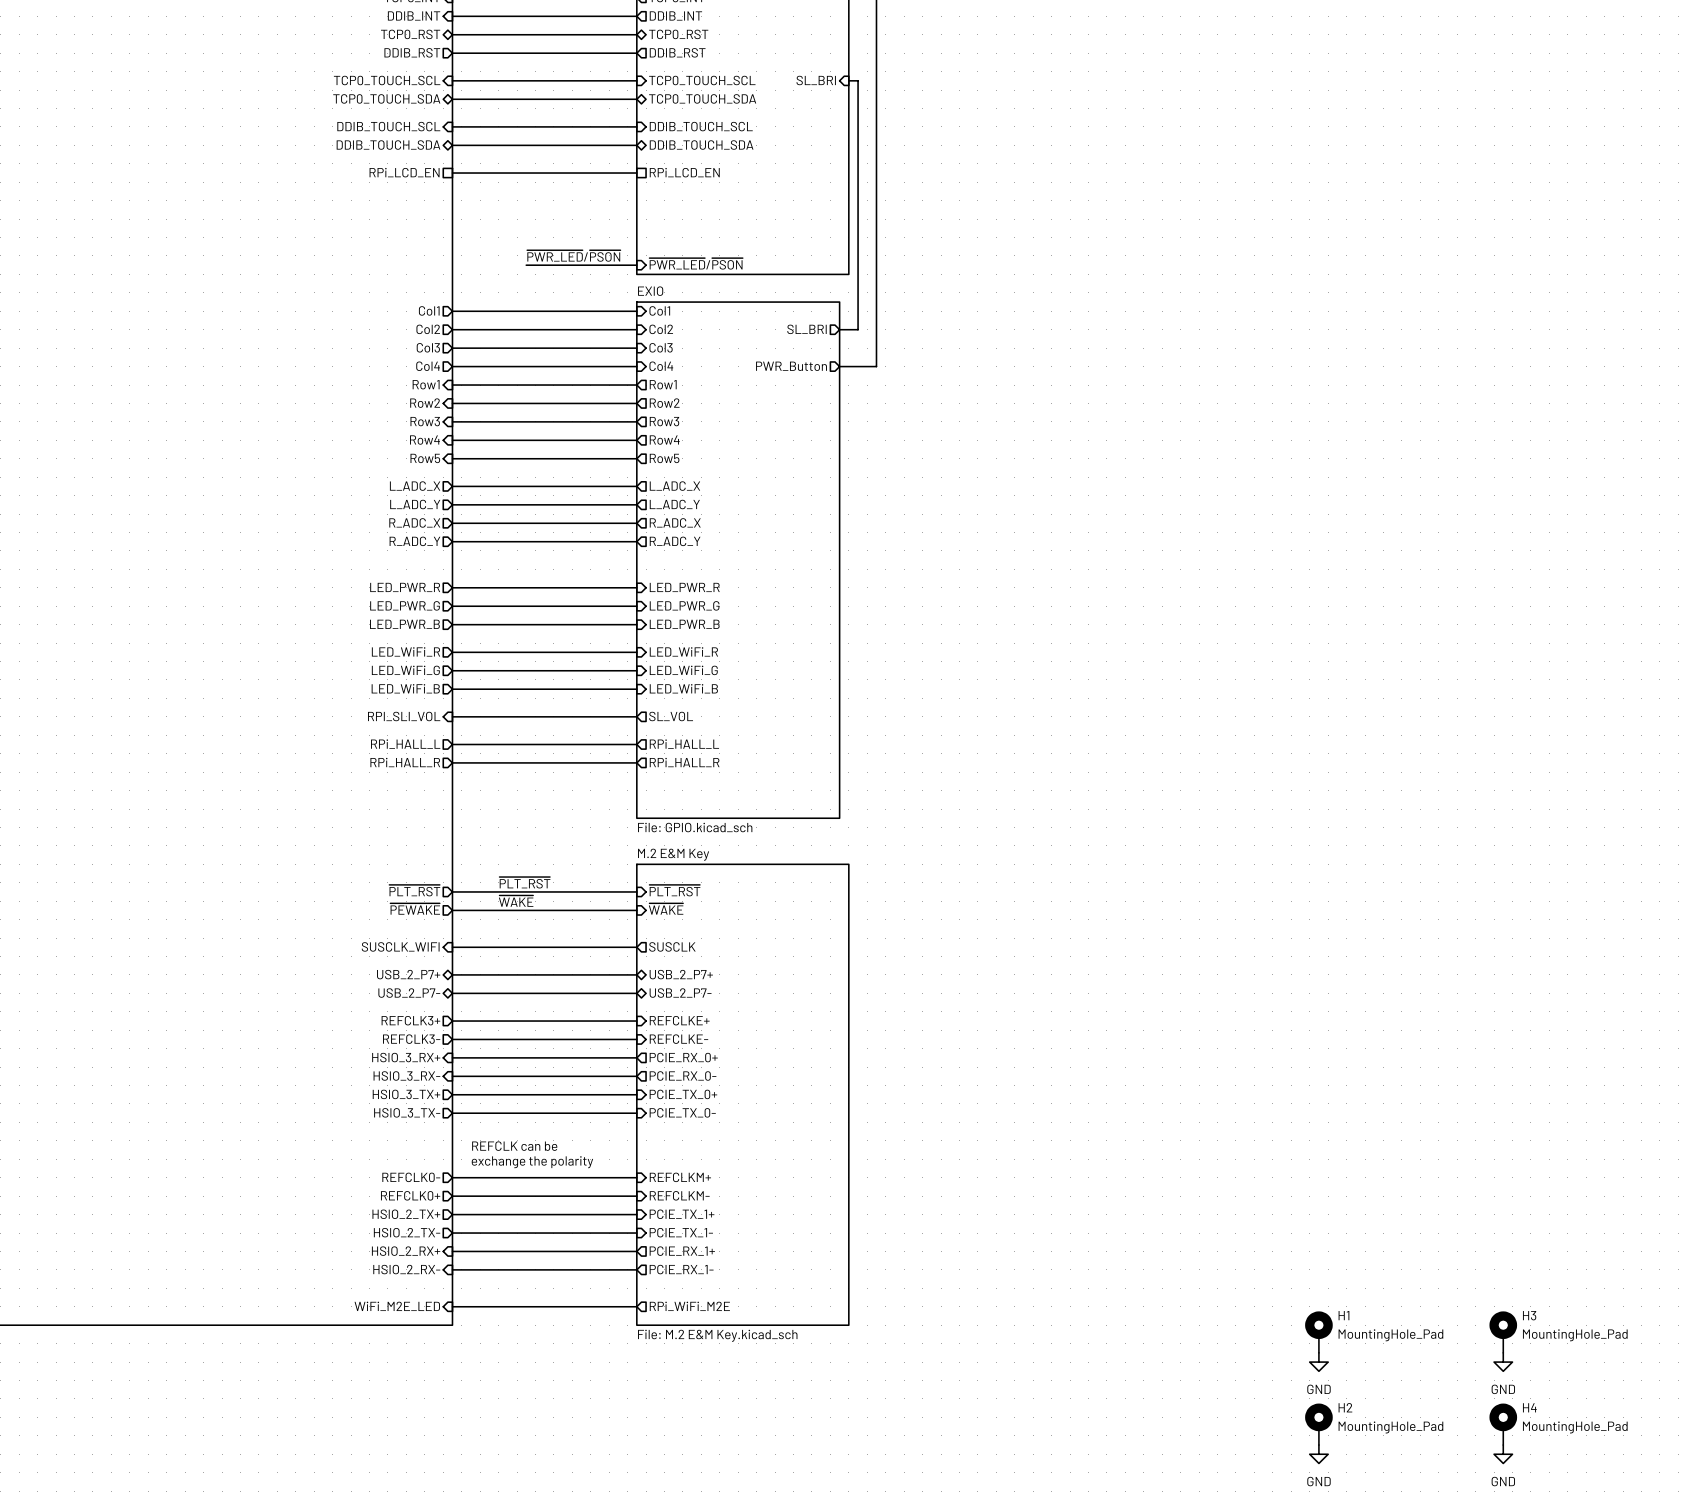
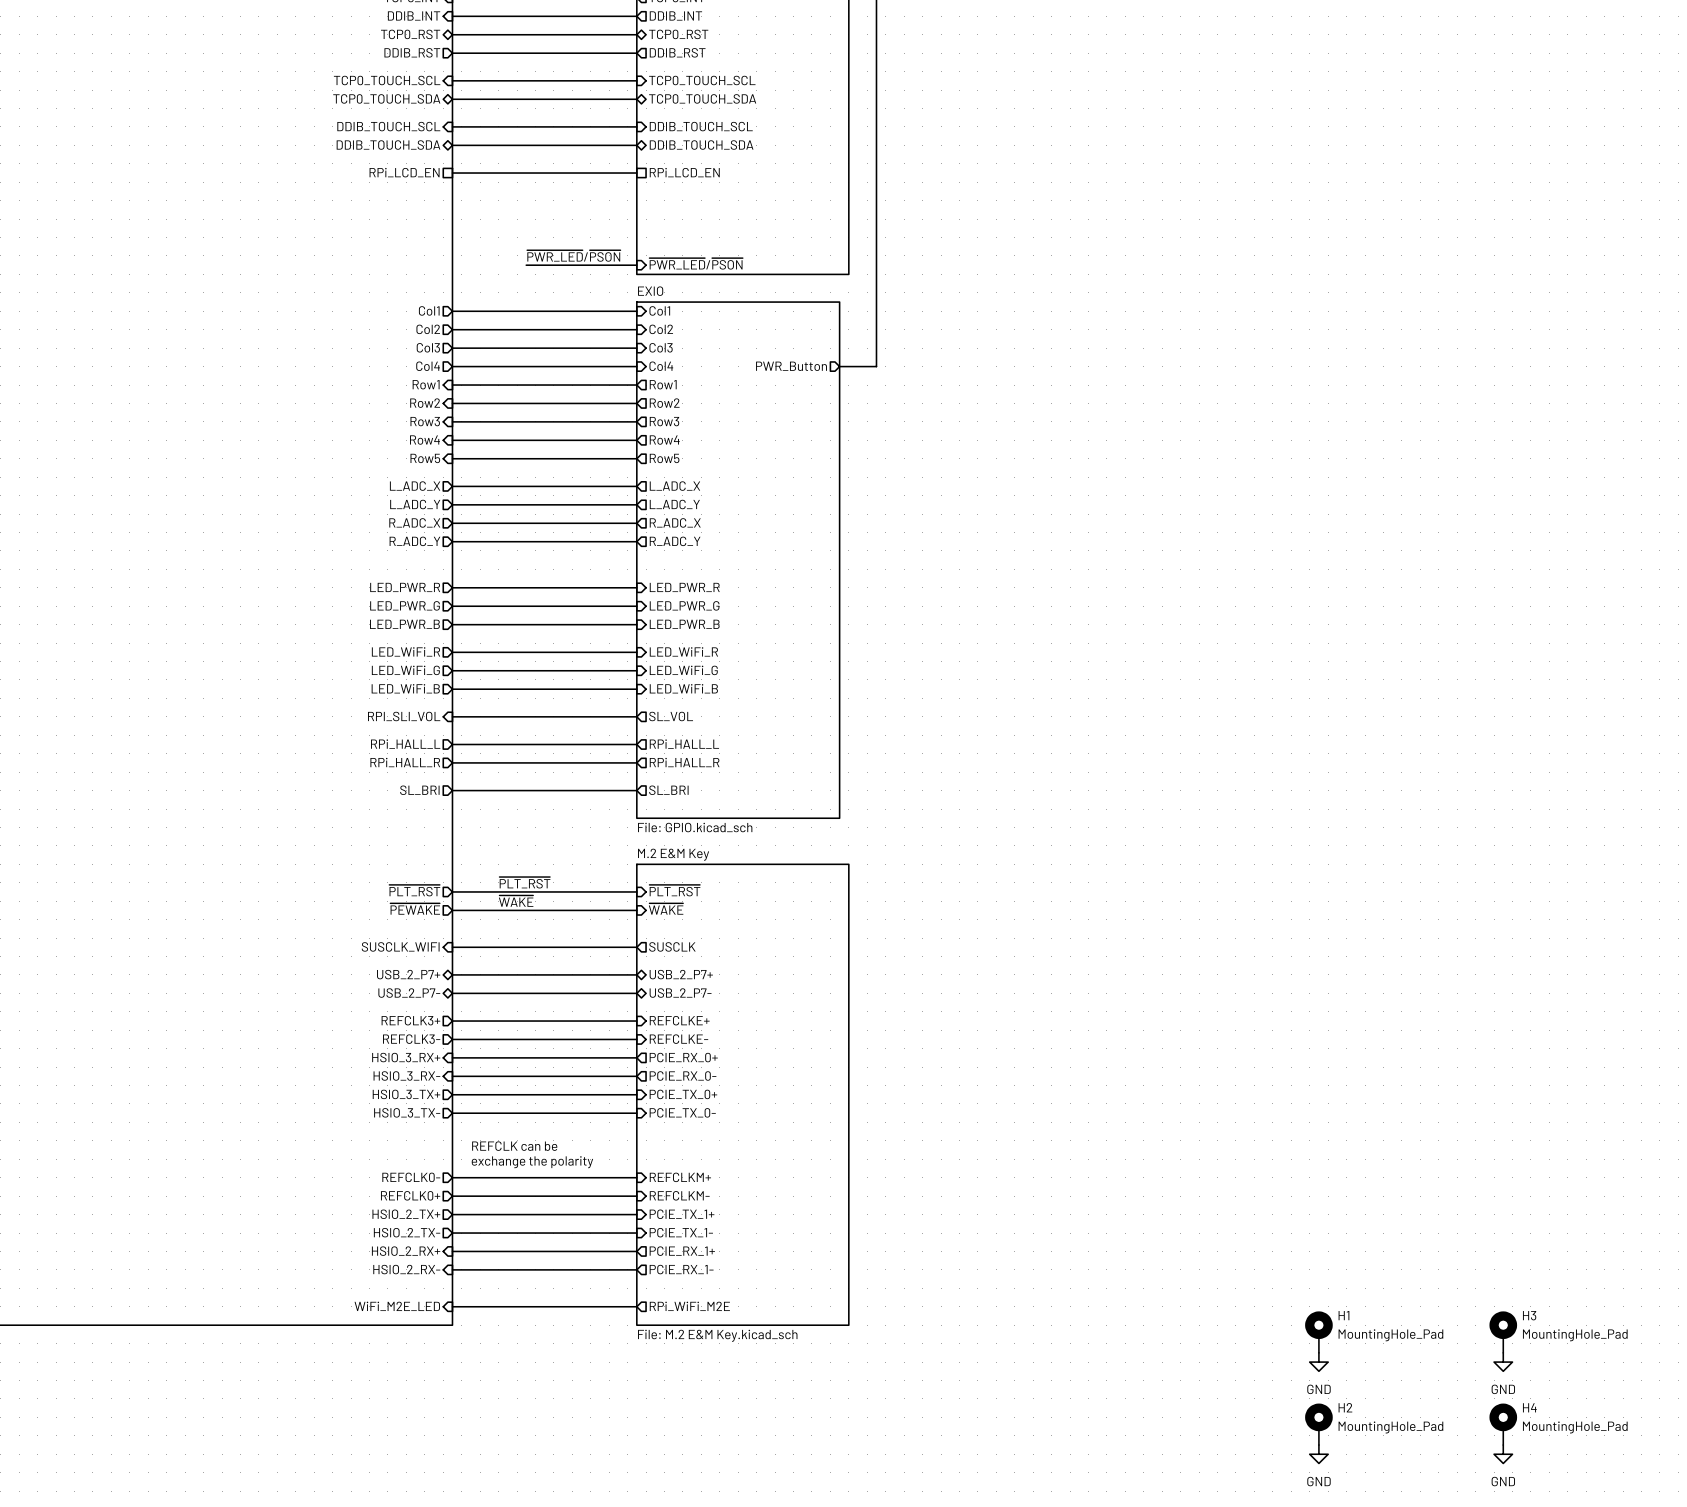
sheet pin: SL_BRI (816, 80) -> none
wire: (848, 80) (858, 80) (858, 329) (839, 329) -> none
sheet pin: SL_BRI (807, 329) -> none
sheet pin: none -> SL_BRI (419, 790)
wire: none -> (452, 790) (636, 790)
sheet pin: none -> SL_BRI (668, 790)

